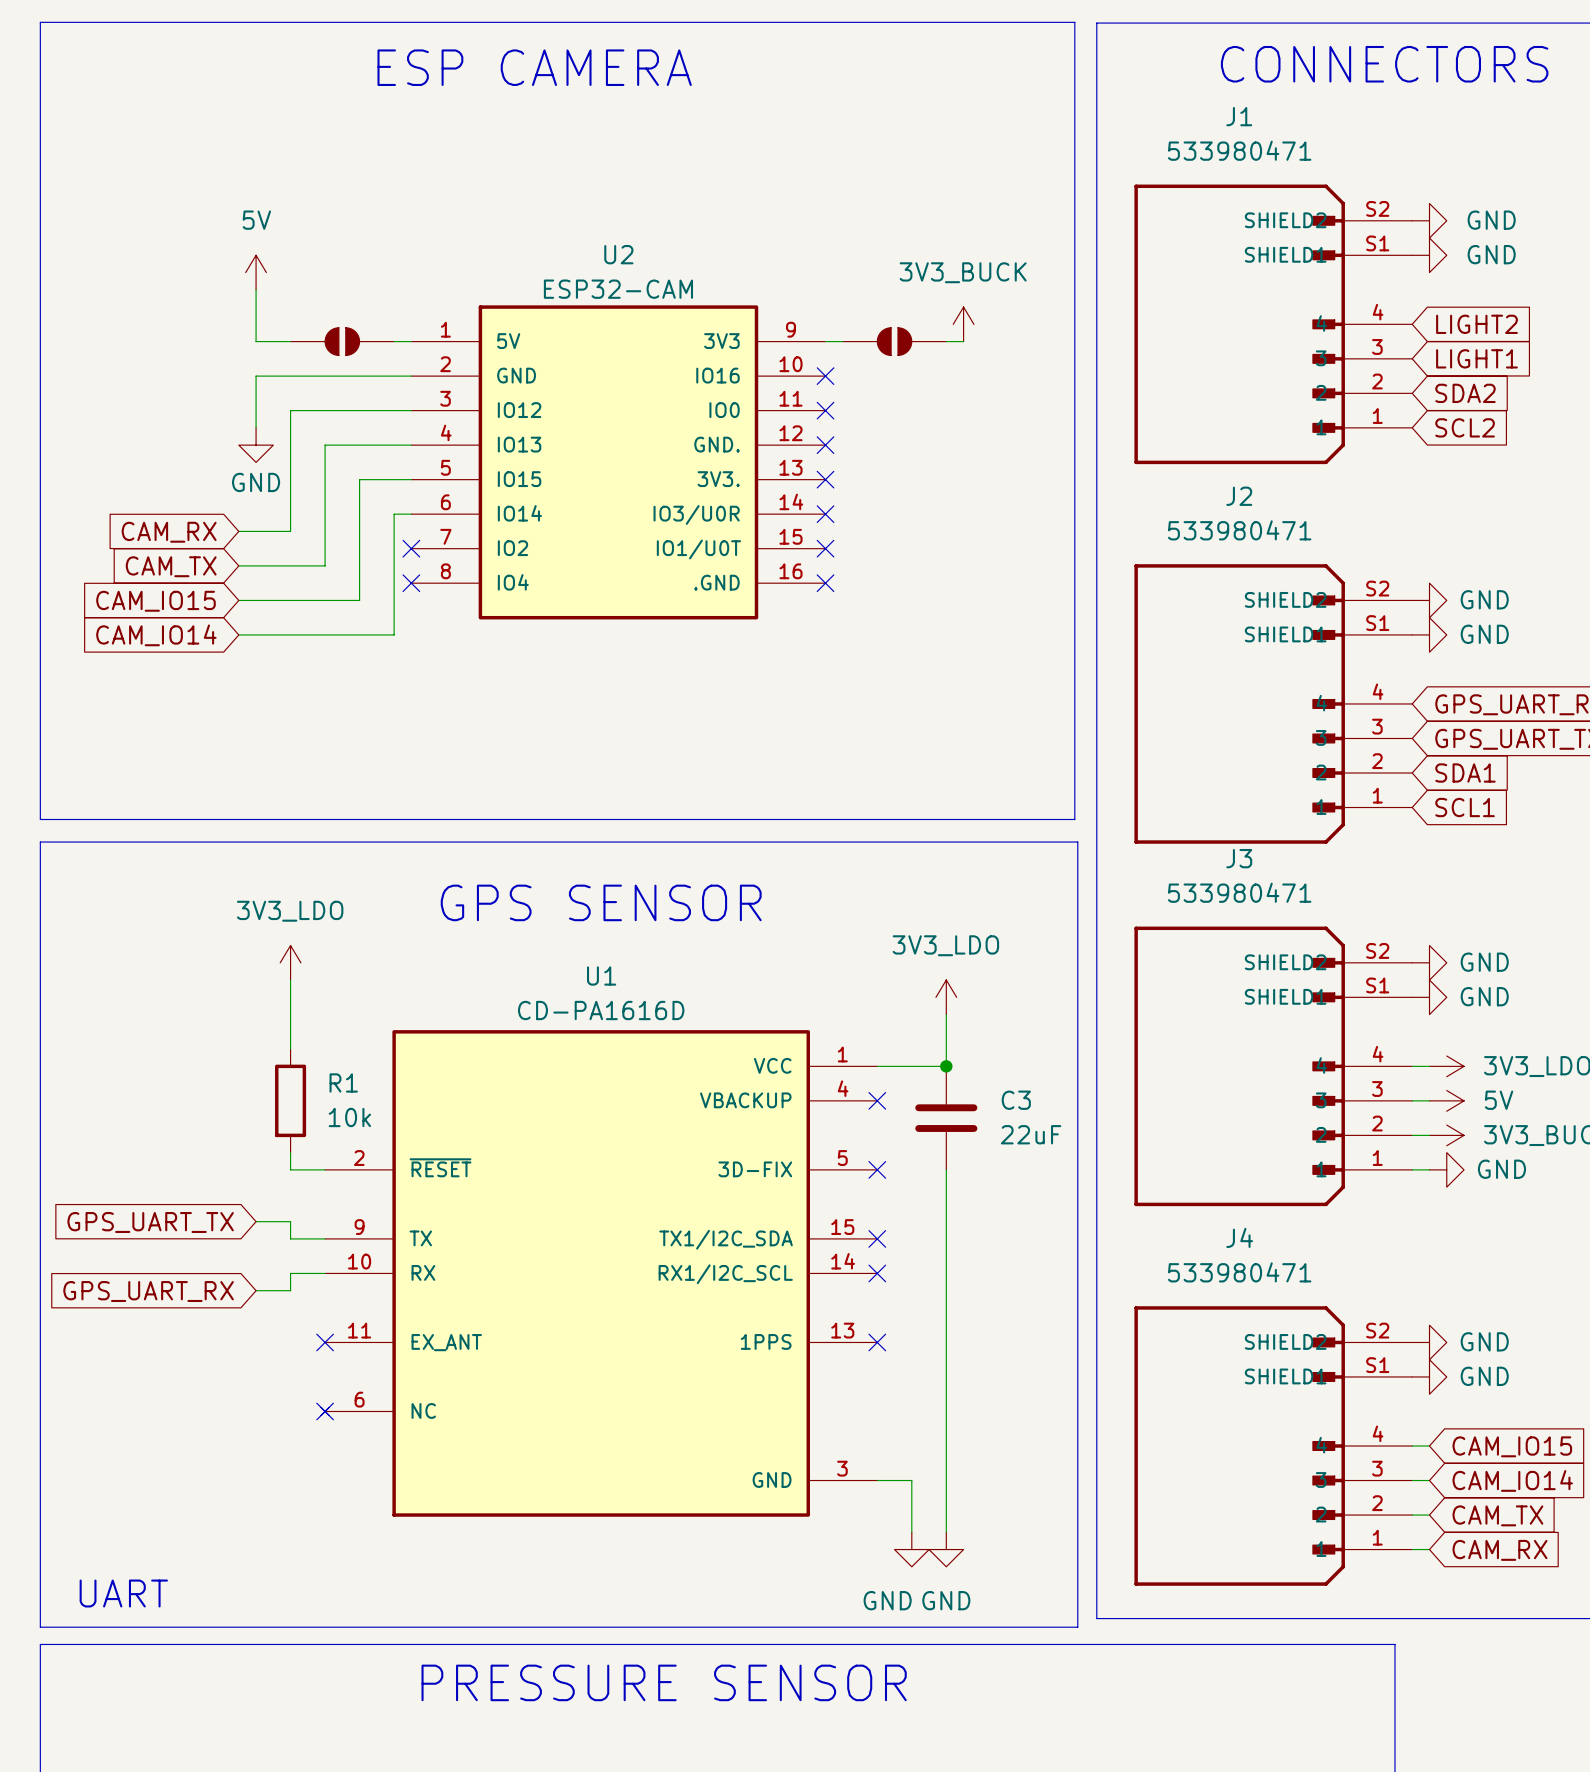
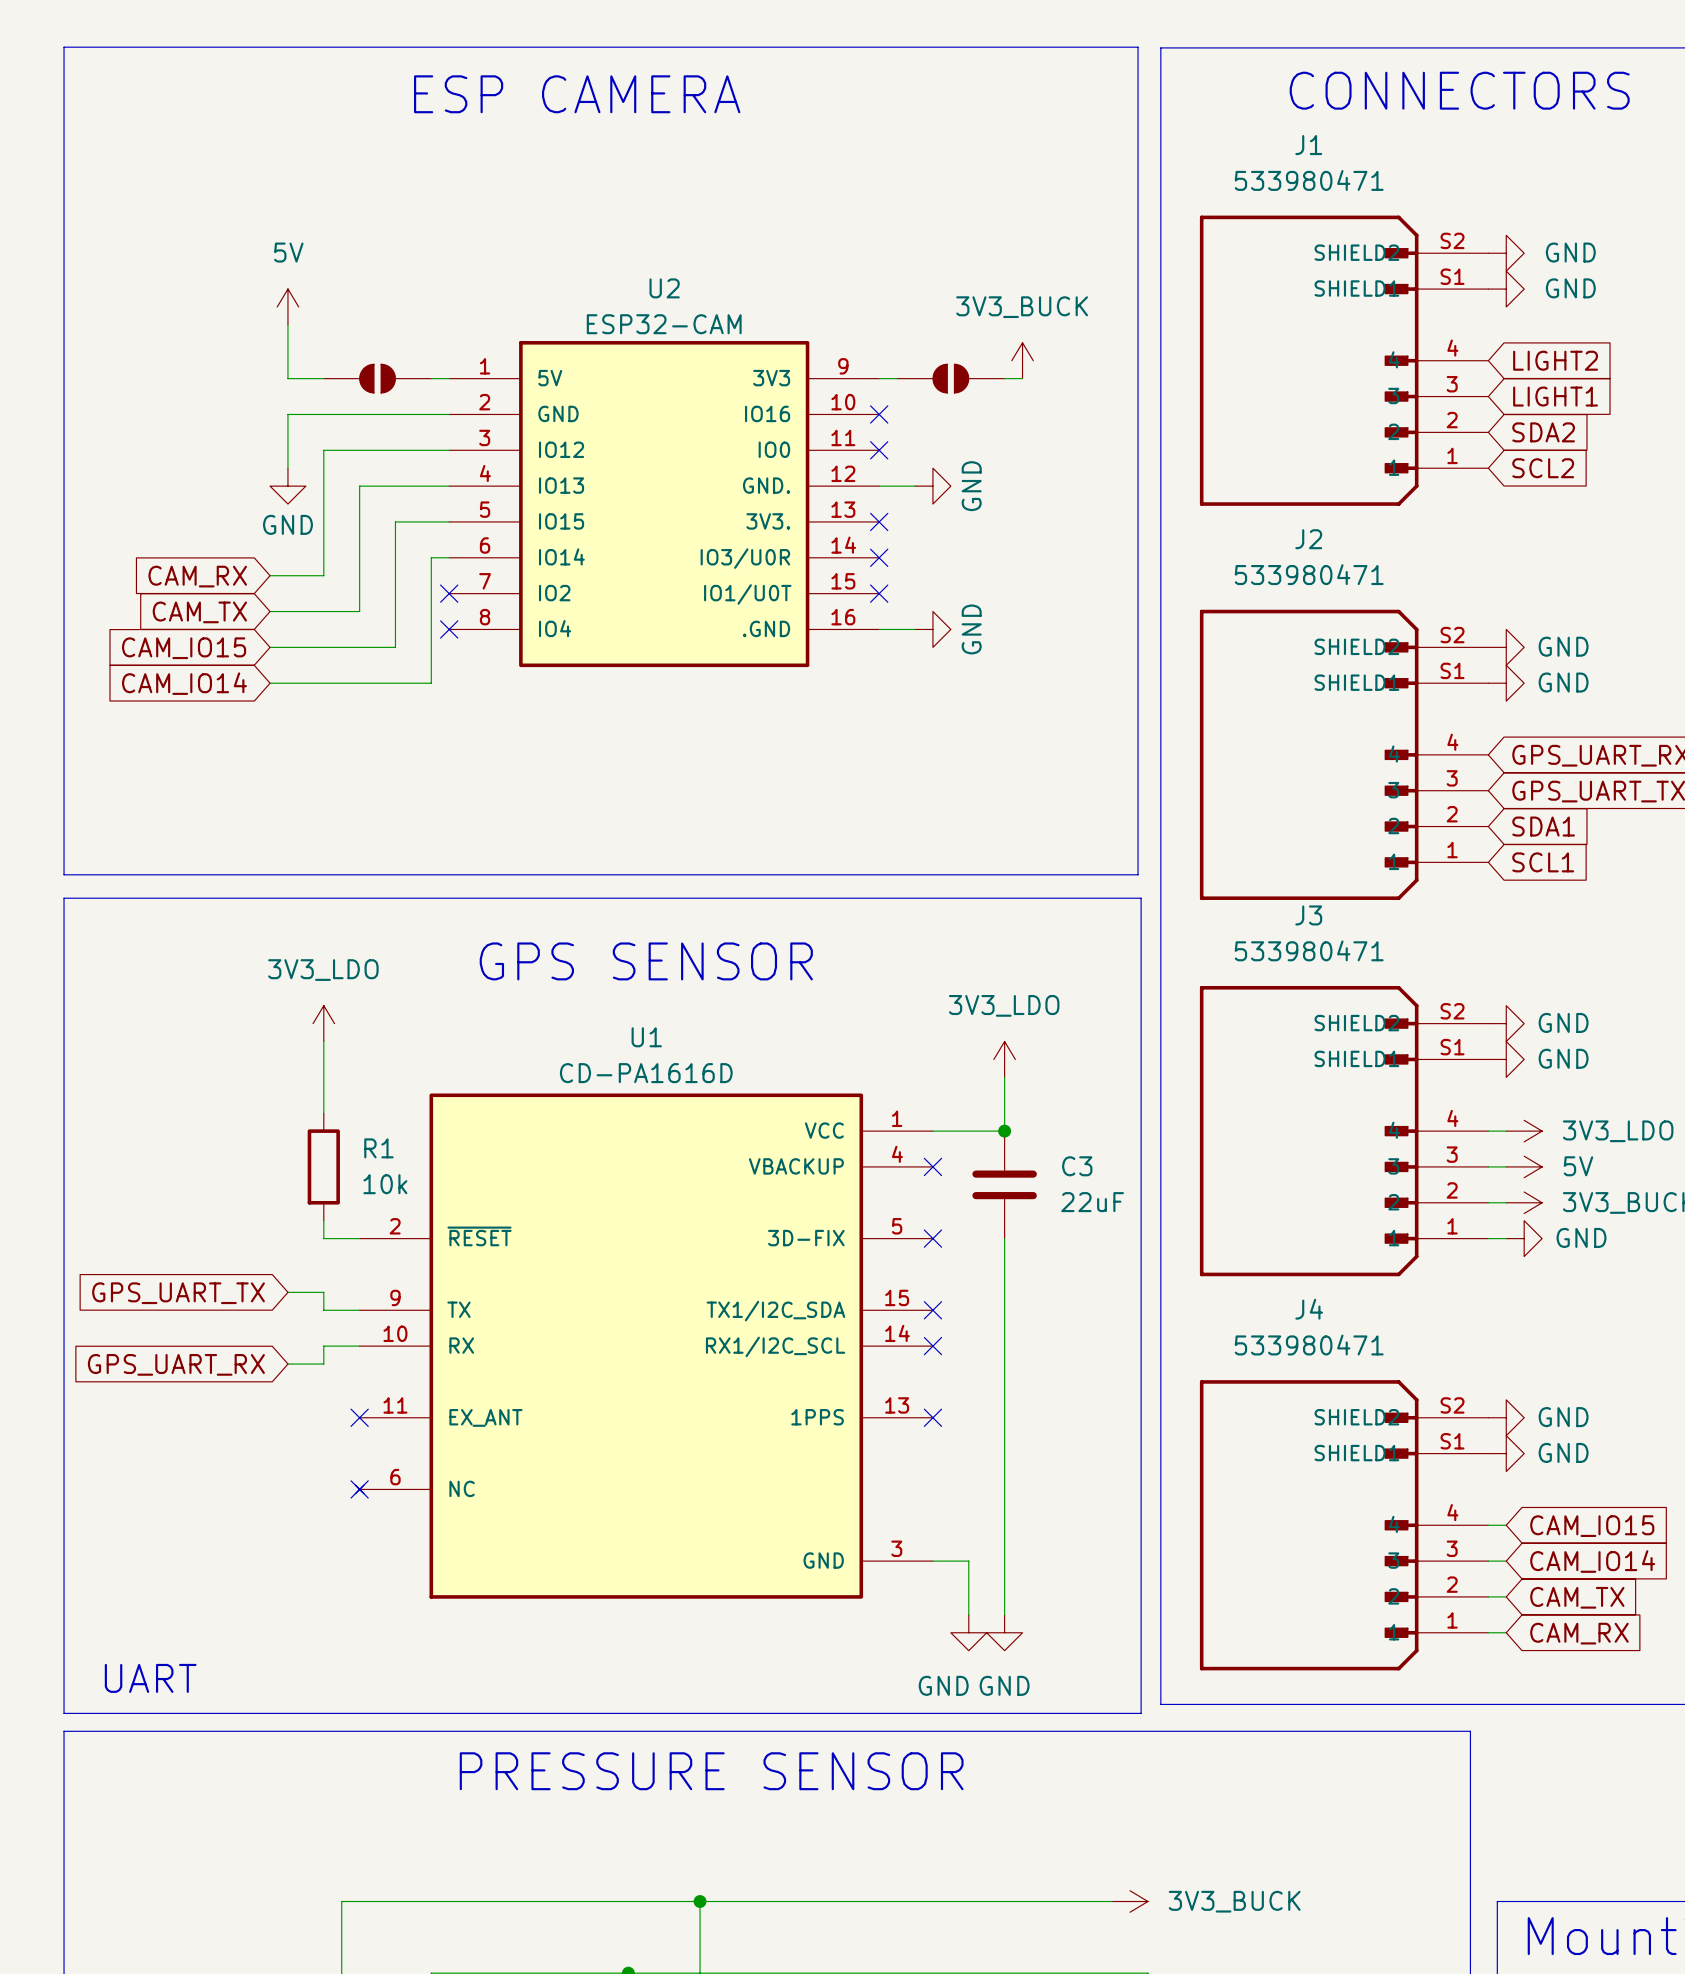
wire: none -> (879, 486) (915, 486)
no-connect mark: (825, 445) -> none
power symbol: none -> GND (932, 486)
wire: none -> (879, 629) (915, 629)
no-connect mark: (825, 583) -> none
power symbol: none -> GND (932, 629)

